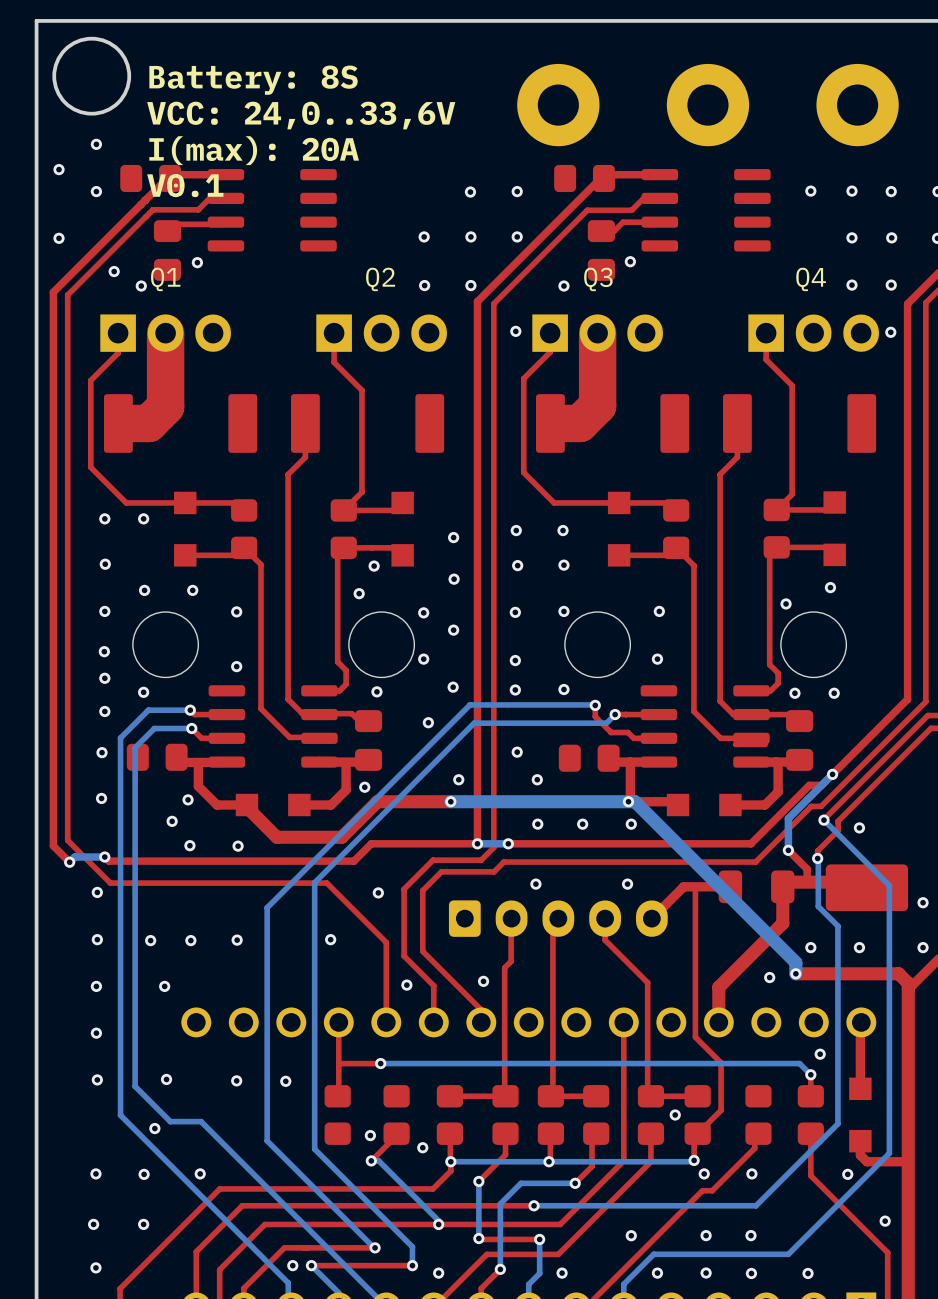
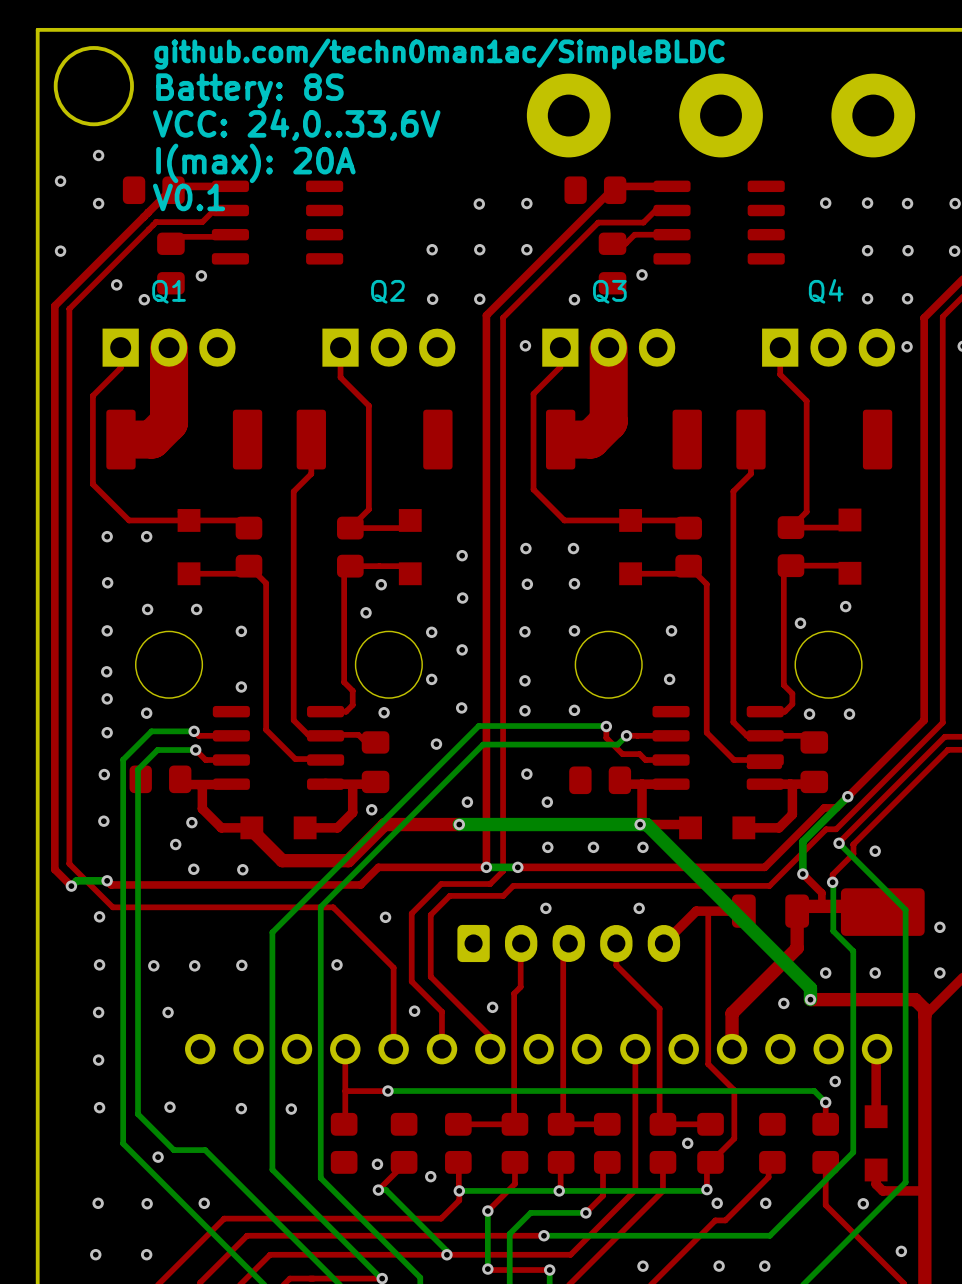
text: none -> github.com/techn0man1ac/SimpleBLDC (439, 54)

